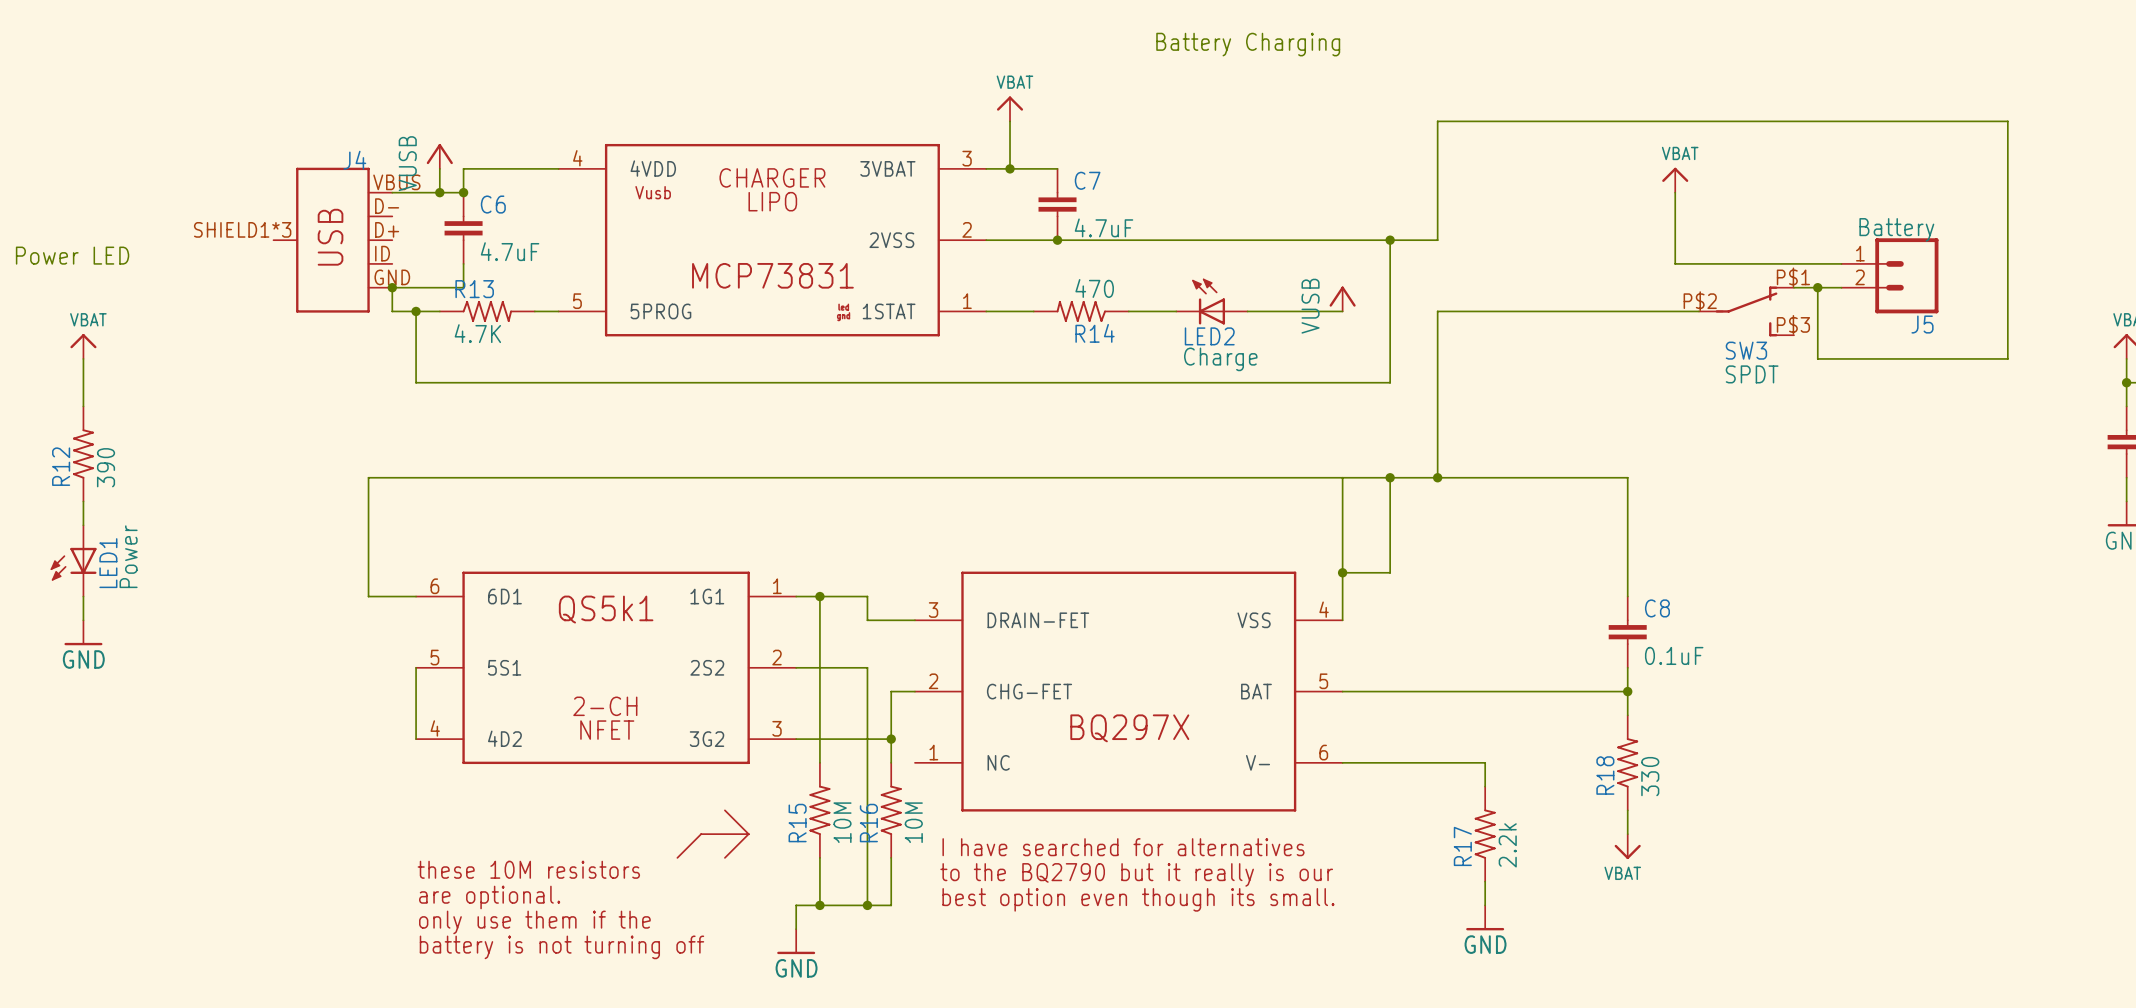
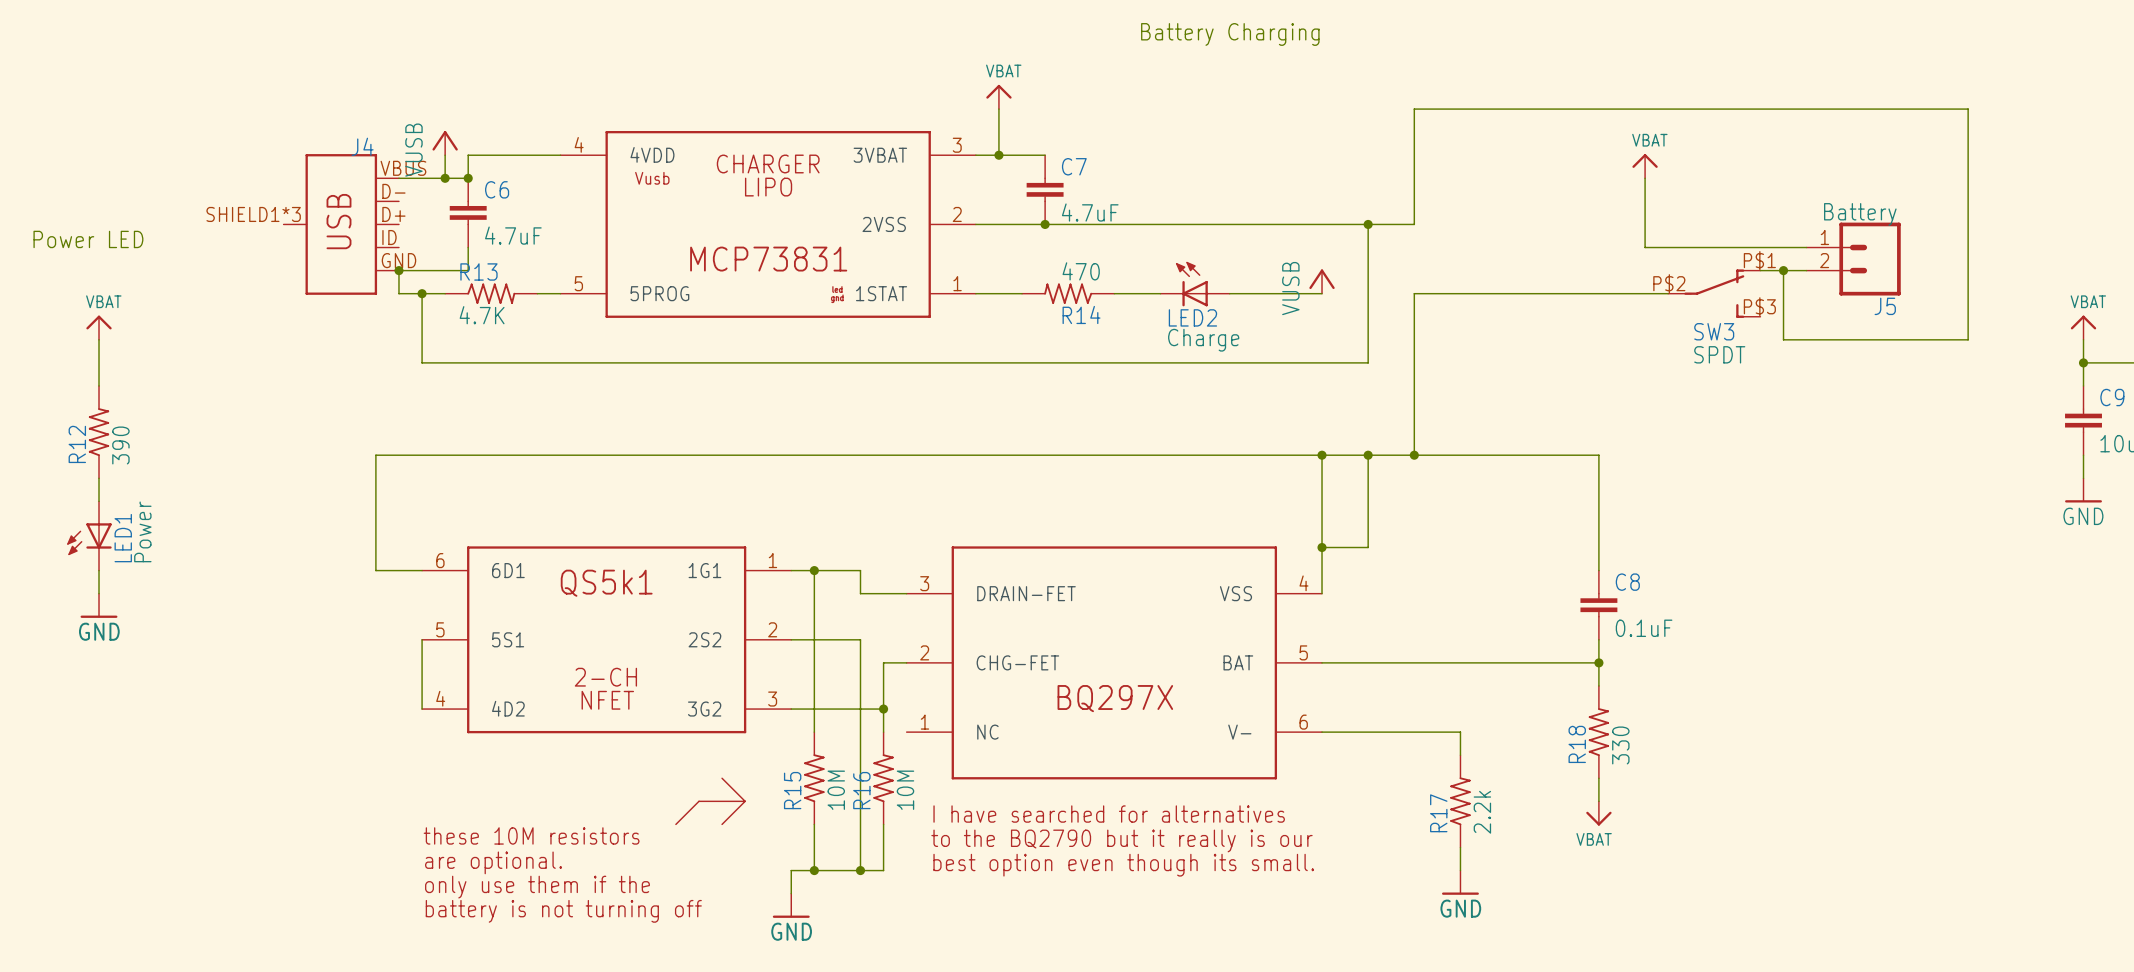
junction: none -> (1322, 455)

